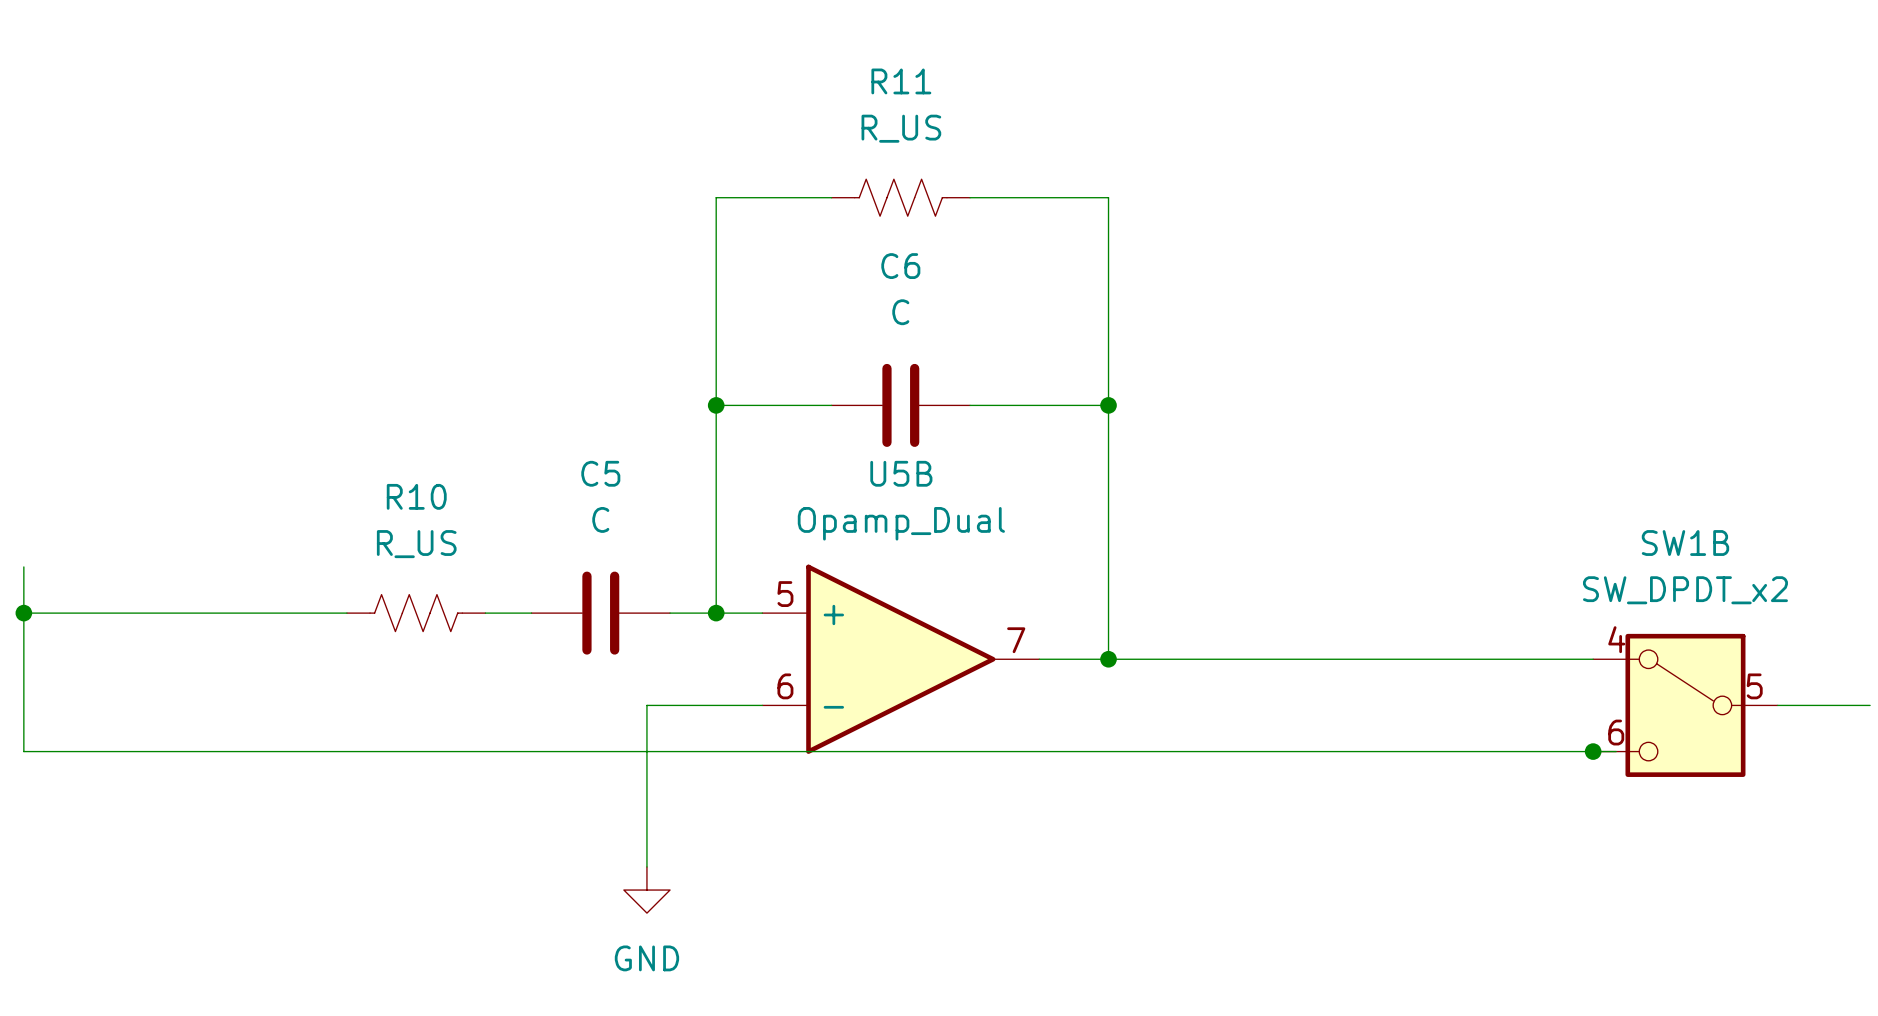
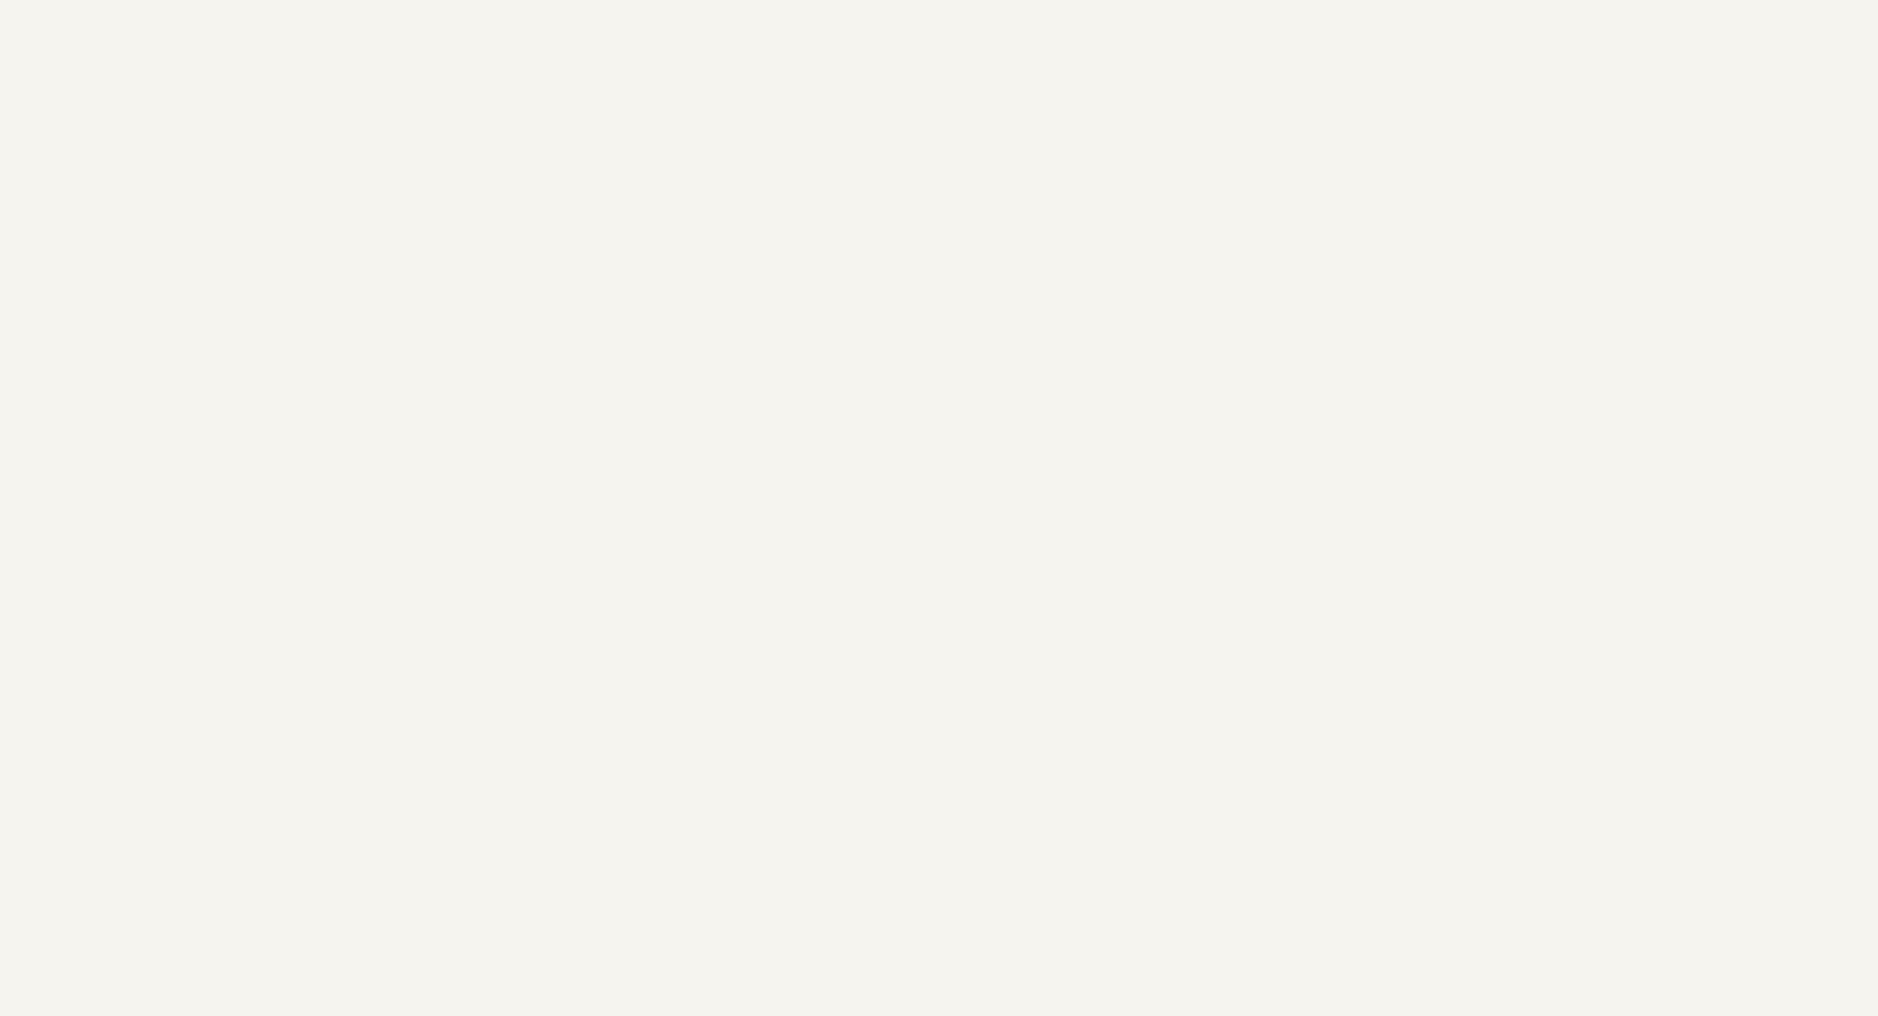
wire: (831, 197) (716, 197) (716, 613) -> none
R11: R_US (900, 197) -> none
wire: (970, 197) (1108, 197) (1108, 659) -> none
wire: (716, 405) (831, 405) -> none
junction: (716, 405) -> none
C6: C (900, 405) -> none
wire: (970, 405) (1108, 405) -> none
junction: (1108, 405) -> none
wire: (23, 566) (23, 751) (1616, 751) -> none
wire: (23, 613) (346, 613) -> none
junction: (23, 613) -> none
R10: R_US (416, 613) -> none
wire: (485, 613) (531, 613) -> none
C5: C (600, 613) -> none
wire: (670, 613) (762, 613) -> none
junction: (716, 613) -> none
U5B: Opamp_Dual (900, 659) -> none
wire: (1039, 659) (1593, 659) -> none
junction: (1108, 659) -> none
wire: (762, 705) (646, 705) (646, 866) -> none
SW1B: SW_DPDT_x2 (1685, 705) -> none
wire: (1777, 705) (1870, 705) -> none
junction: (1593, 751) -> none
power symbol: GND (646, 890) -> none

